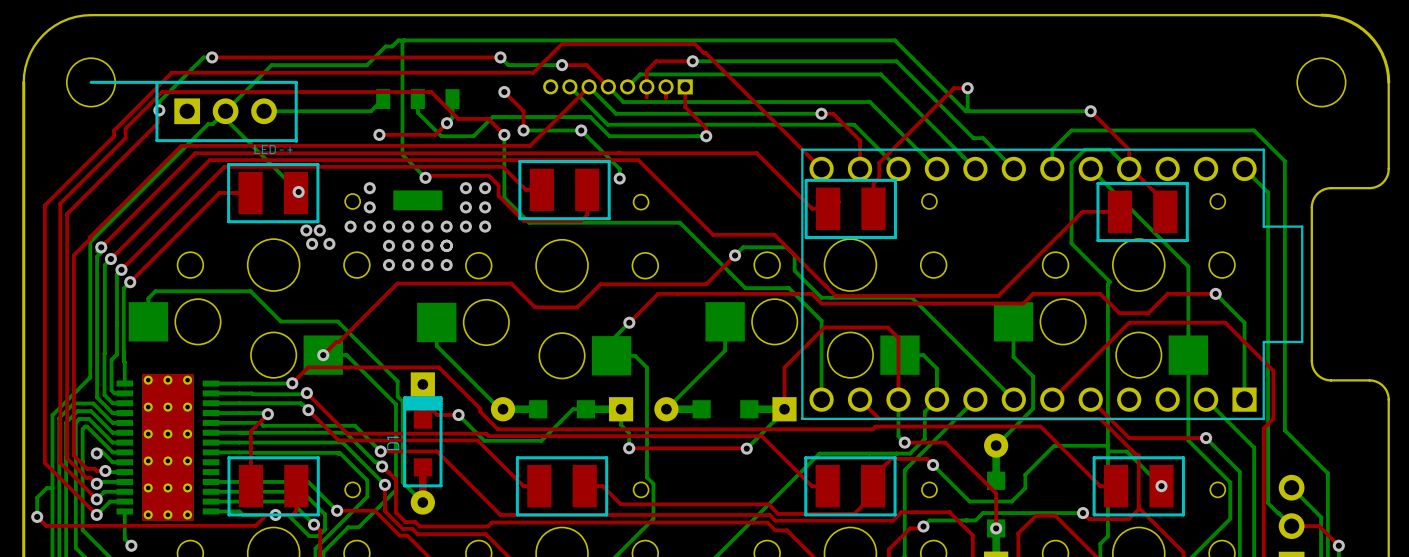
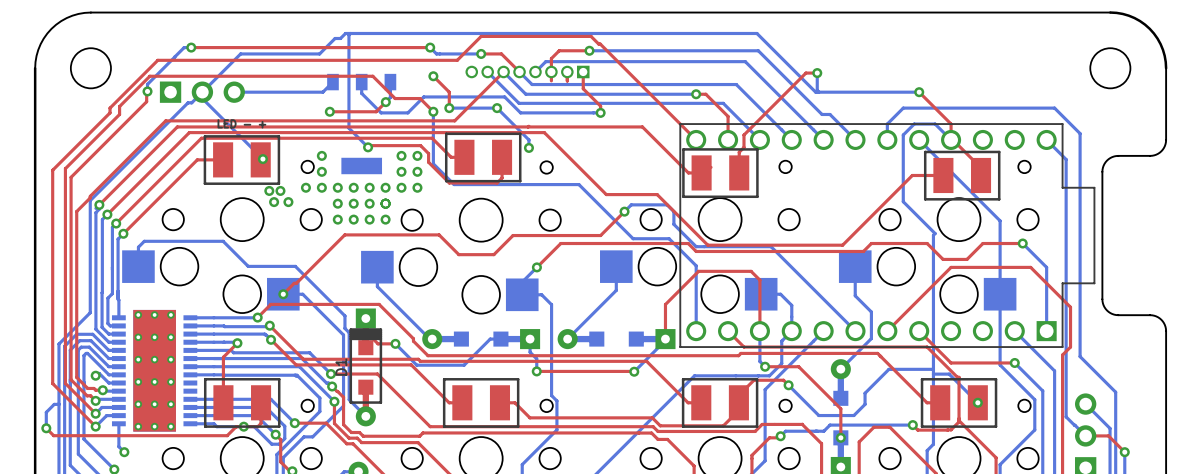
line: (91, 82) (296, 82) (296, 141) -> none
line: (156, 83) (156, 140) (296, 140) -> none

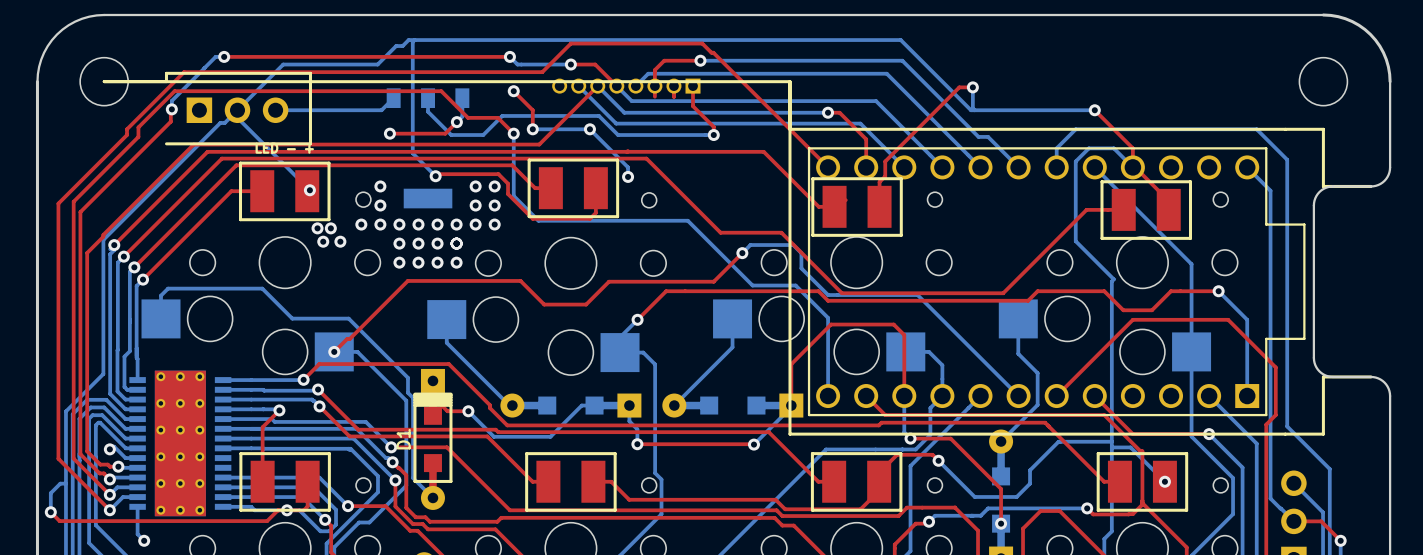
line: none -> (104, 81) (789, 81) (789, 434) (1323, 434) (1323, 376) (1371, 376)
line: none -> (166, 81) (166, 73) (310, 73) (310, 143) (166, 143)
line: none -> (789, 129) (1323, 129) (1323, 186) (1371, 186)

